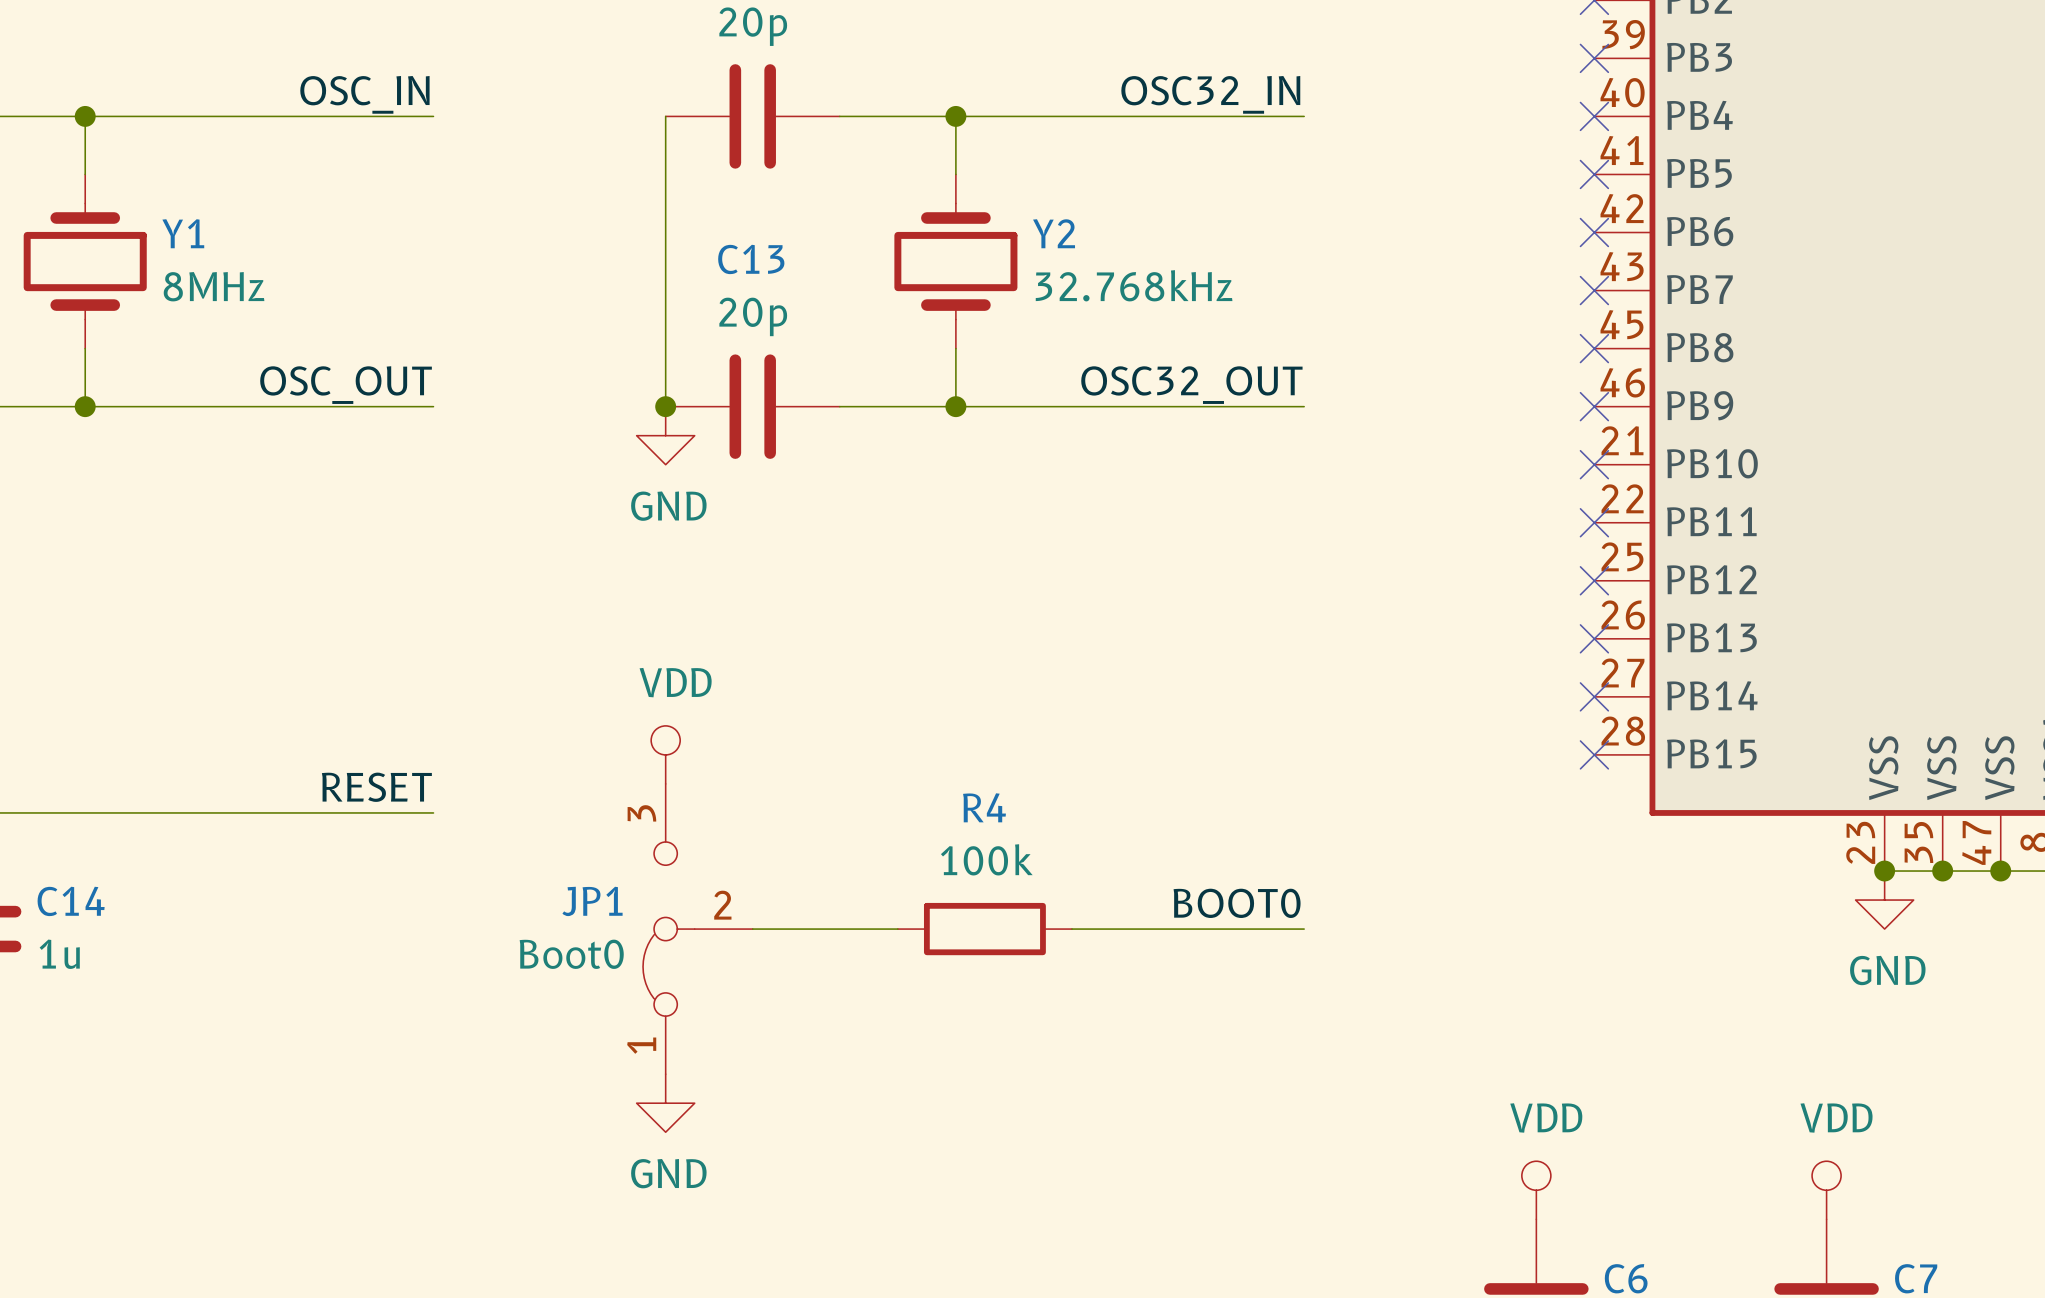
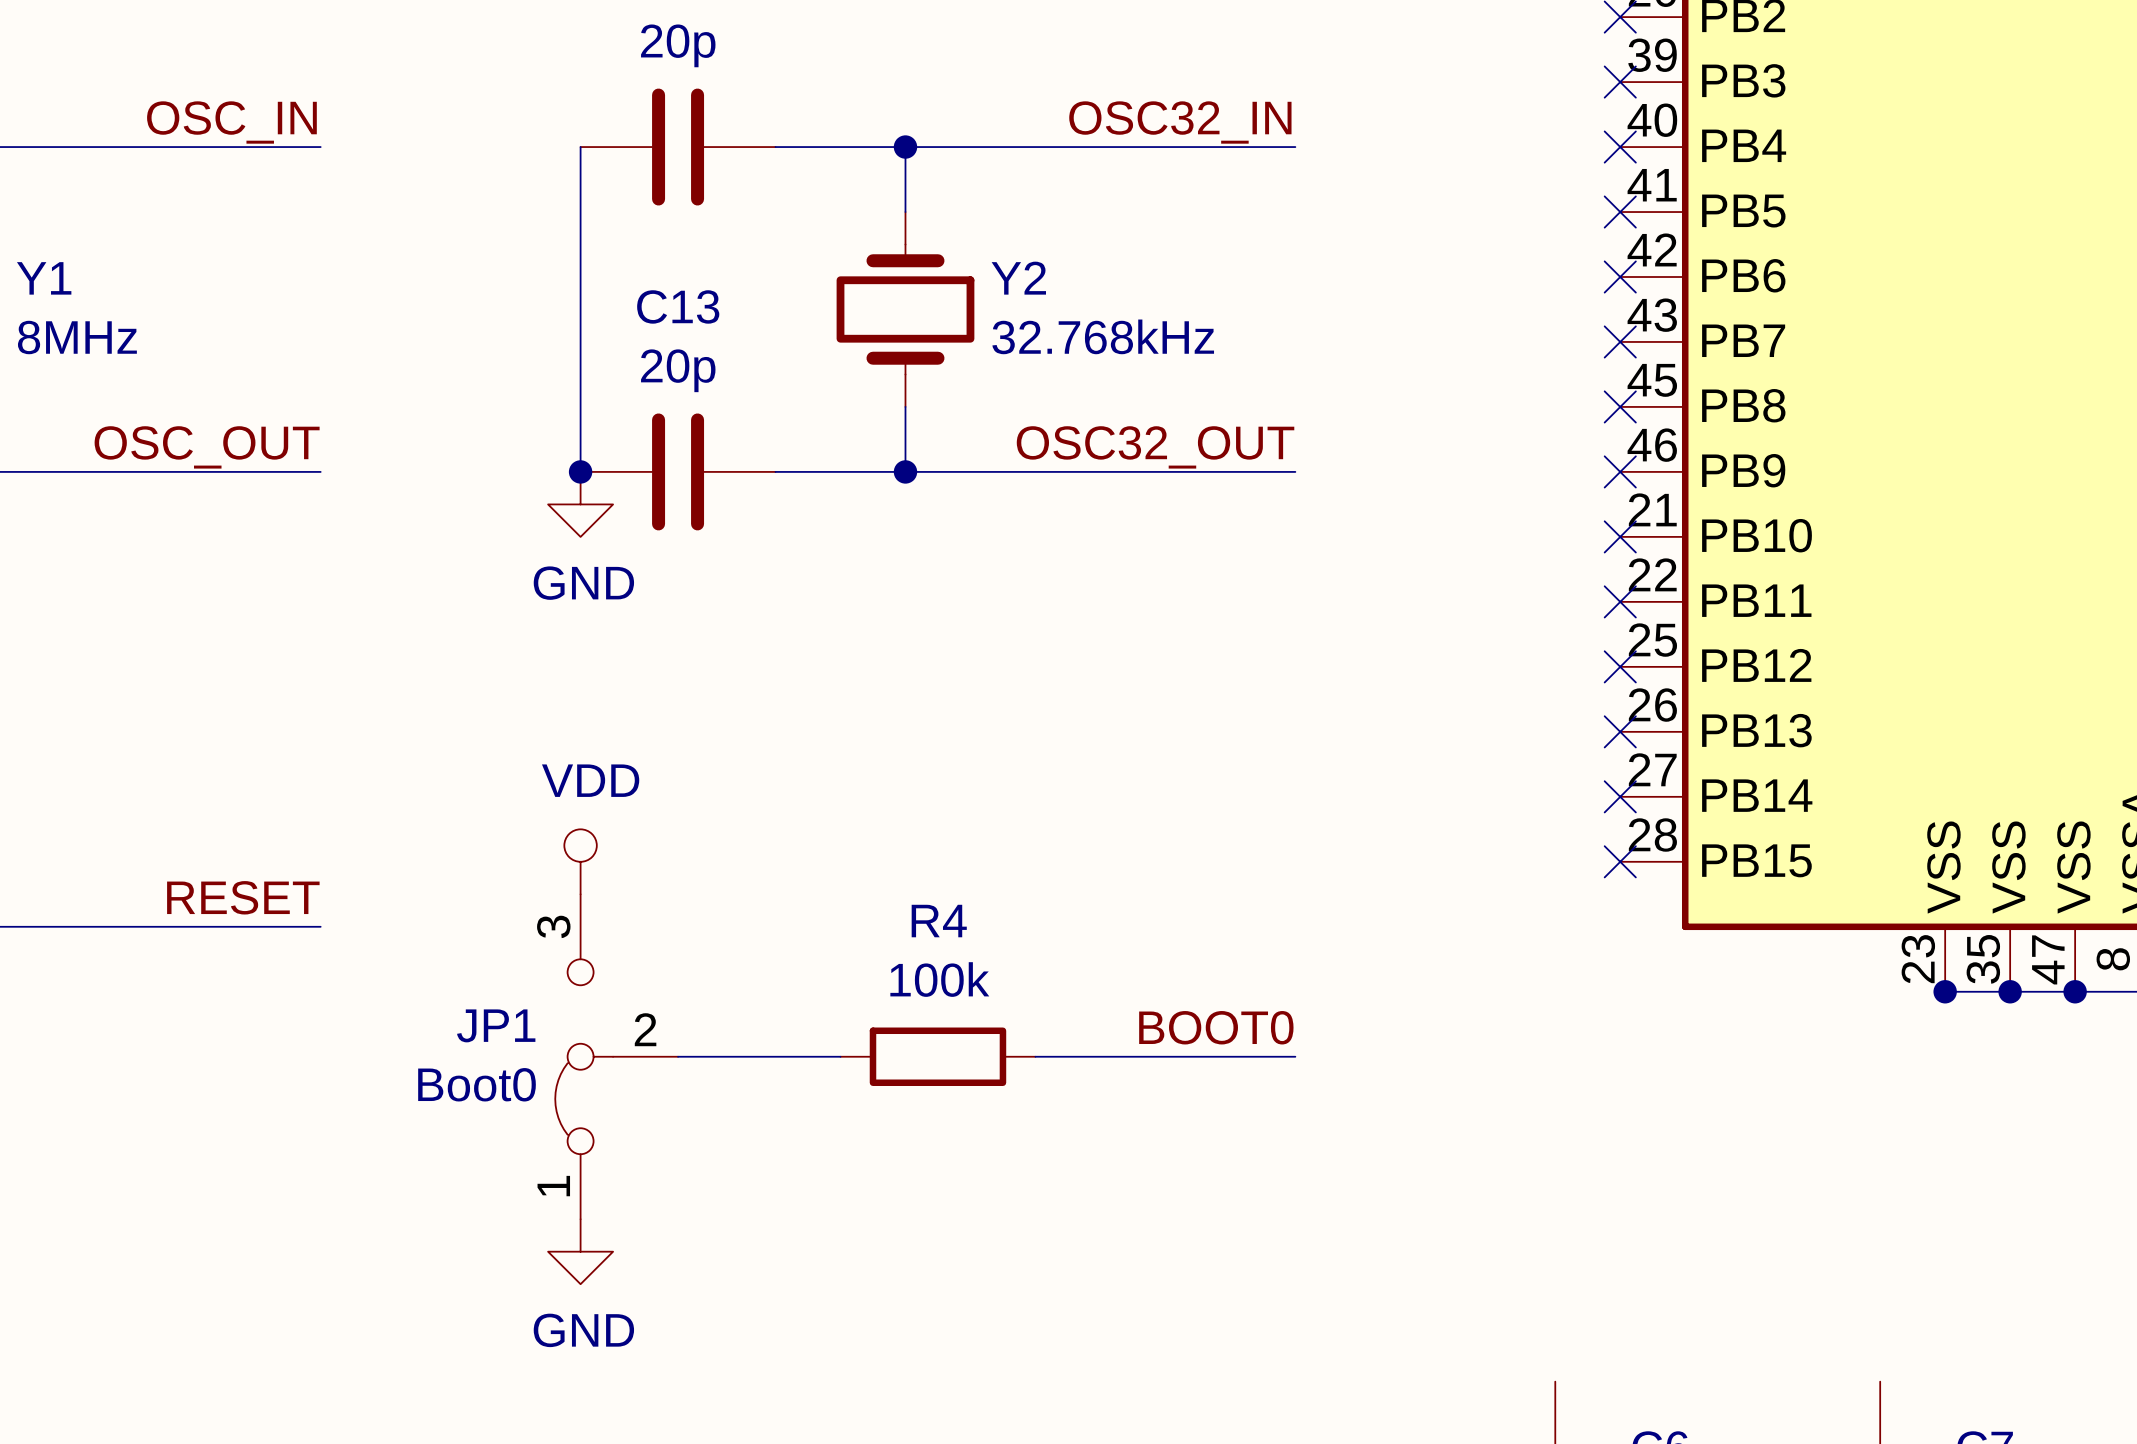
power symbol: GND (1884, 900) -> none
power symbol: VDD (1536, 1190) -> none
power symbol: VDD (1826, 1190) -> none

